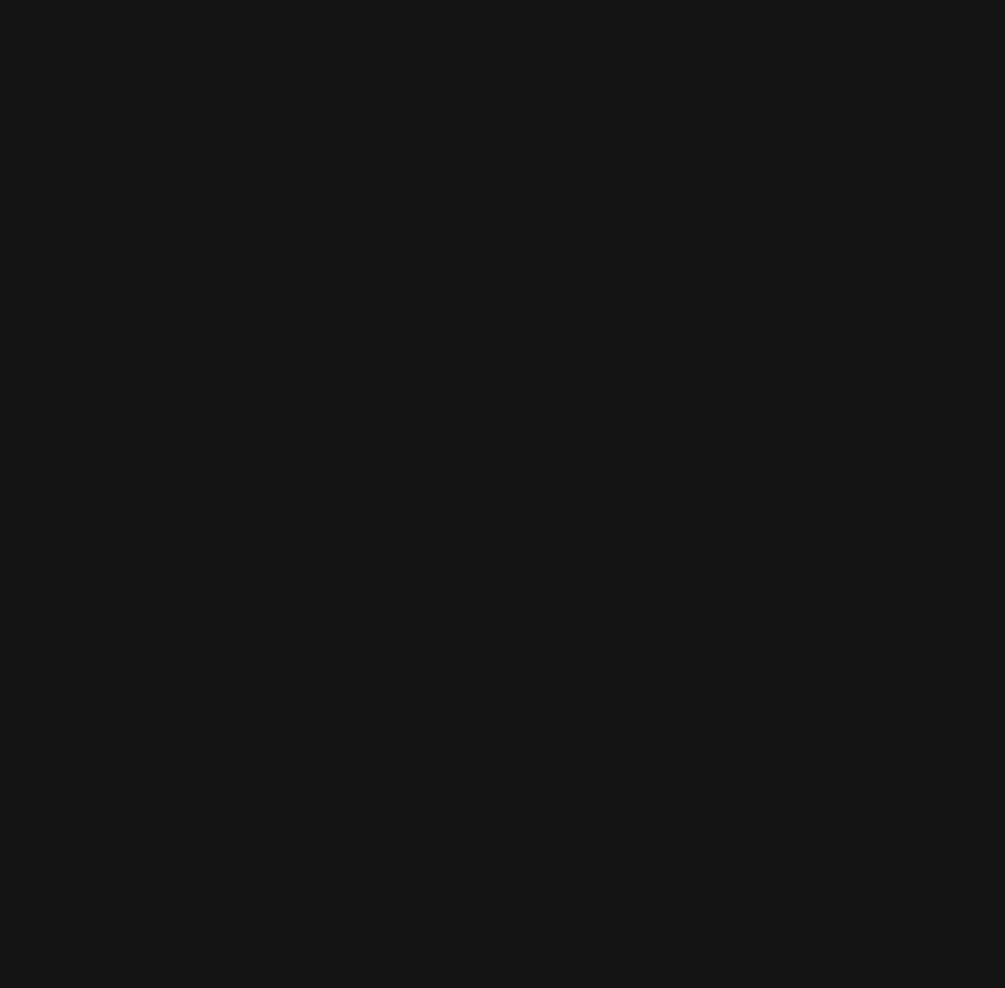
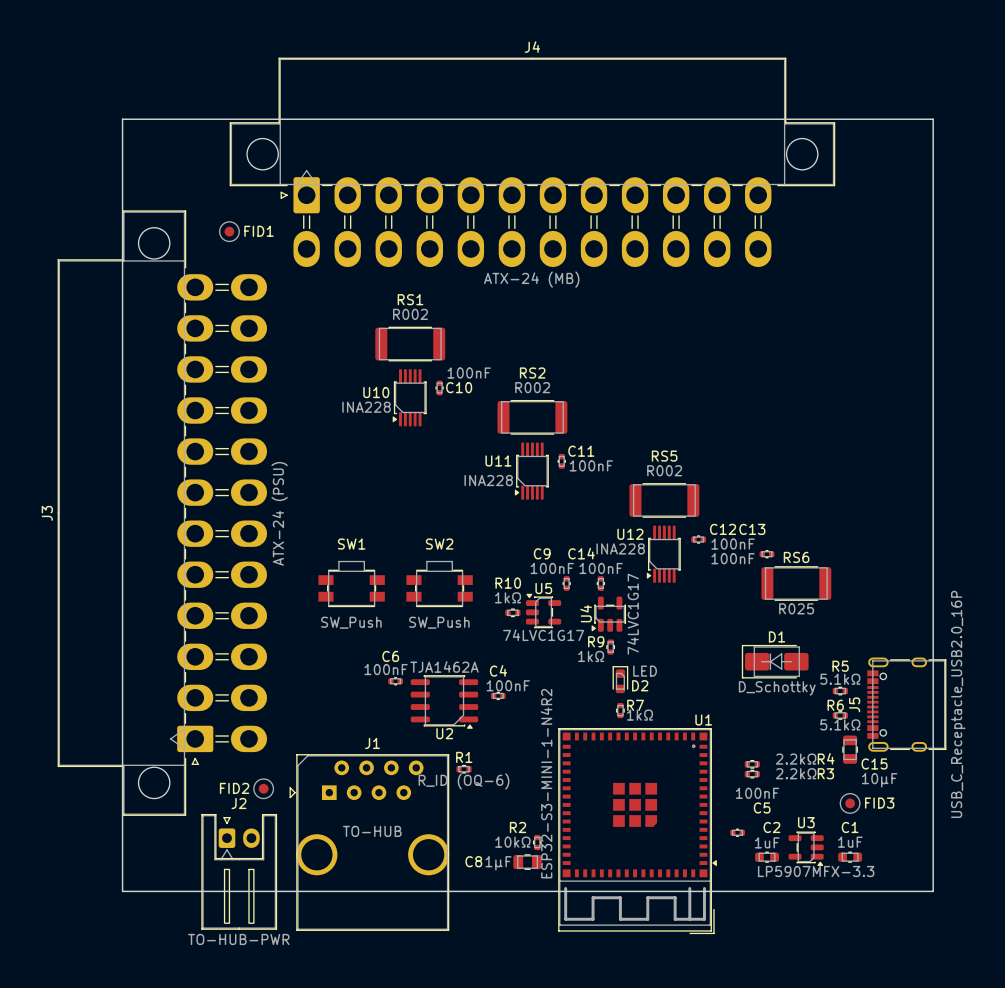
board edge: none -> (122, 119) (933, 119) (933, 891) (122, 891) (122, 119)
J4: none -> ATX-24 (MB) (532, 162)
FID1: none -> (229, 231)
RS1: none -> R002 (410, 344)
C10: none -> 100nF (439, 388)
U10: none -> INA228 (409, 397)
RS2: none -> R002 (532, 417)
C11: none -> 100nF (561, 461)
U11: none -> INA228 (531, 471)
RS5: none -> R002 (664, 500)
J3: none -> ATX-24 (PSU) (162, 513)
C12: none -> 100nF (698, 539)
U12: none -> INA228 (663, 554)
C13: none -> 100nF (767, 554)
C9: none -> 100nF (566, 583)
C14: none -> 100nF (600, 583)
RS6: none -> R025 (796, 583)
SW1: none -> SW_Push (351, 584)
SW2: none -> SW_Push (439, 584)
U5: none -> 74LVC1G17 (543, 610)
R10: none -> 1kΩ (512, 612)
U4: none -> 74LVC1G17 (608, 614)
R9: none -> 1kΩ (610, 647)
D1: none -> D_Schottky (775, 661)
D2: none -> LED (620, 679)
C6: none -> 100nF (395, 681)
R5: none -> 5.1kΩ (840, 691)
C4: none -> 100nF (498, 695)
U2: none -> TJA1462A (444, 701)
J5: none -> USB_C_Receptacle_USB2.0_16P (906, 704)
R7: none -> 1kΩ (620, 710)
R6: none -> 5.1kΩ (840, 715)
C15: none -> 10µF (850, 749)
R4: none -> 2.2kΩ (752, 764)
R1: none -> R_ID (OQ-6) (464, 769)
R3: none -> 2.2kΩ (752, 774)
FID2: none -> (263, 788)
FID3: none -> (850, 803)
U1: none -> ESP32-S3-MINI-1-N4R2 (637, 831)
C5: none -> 100nF (737, 832)
J1: none -> TO-HUB (369, 842)
R2: none -> 10kΩ (537, 842)
U3: none -> LP5907MFX-3.3 (806, 848)
C2: none -> 1uF (767, 857)
C1: none -> 1uF (850, 857)
C8: none -> 1µF (527, 862)
J2: none -> TO-HUB-PWR (239, 871)

